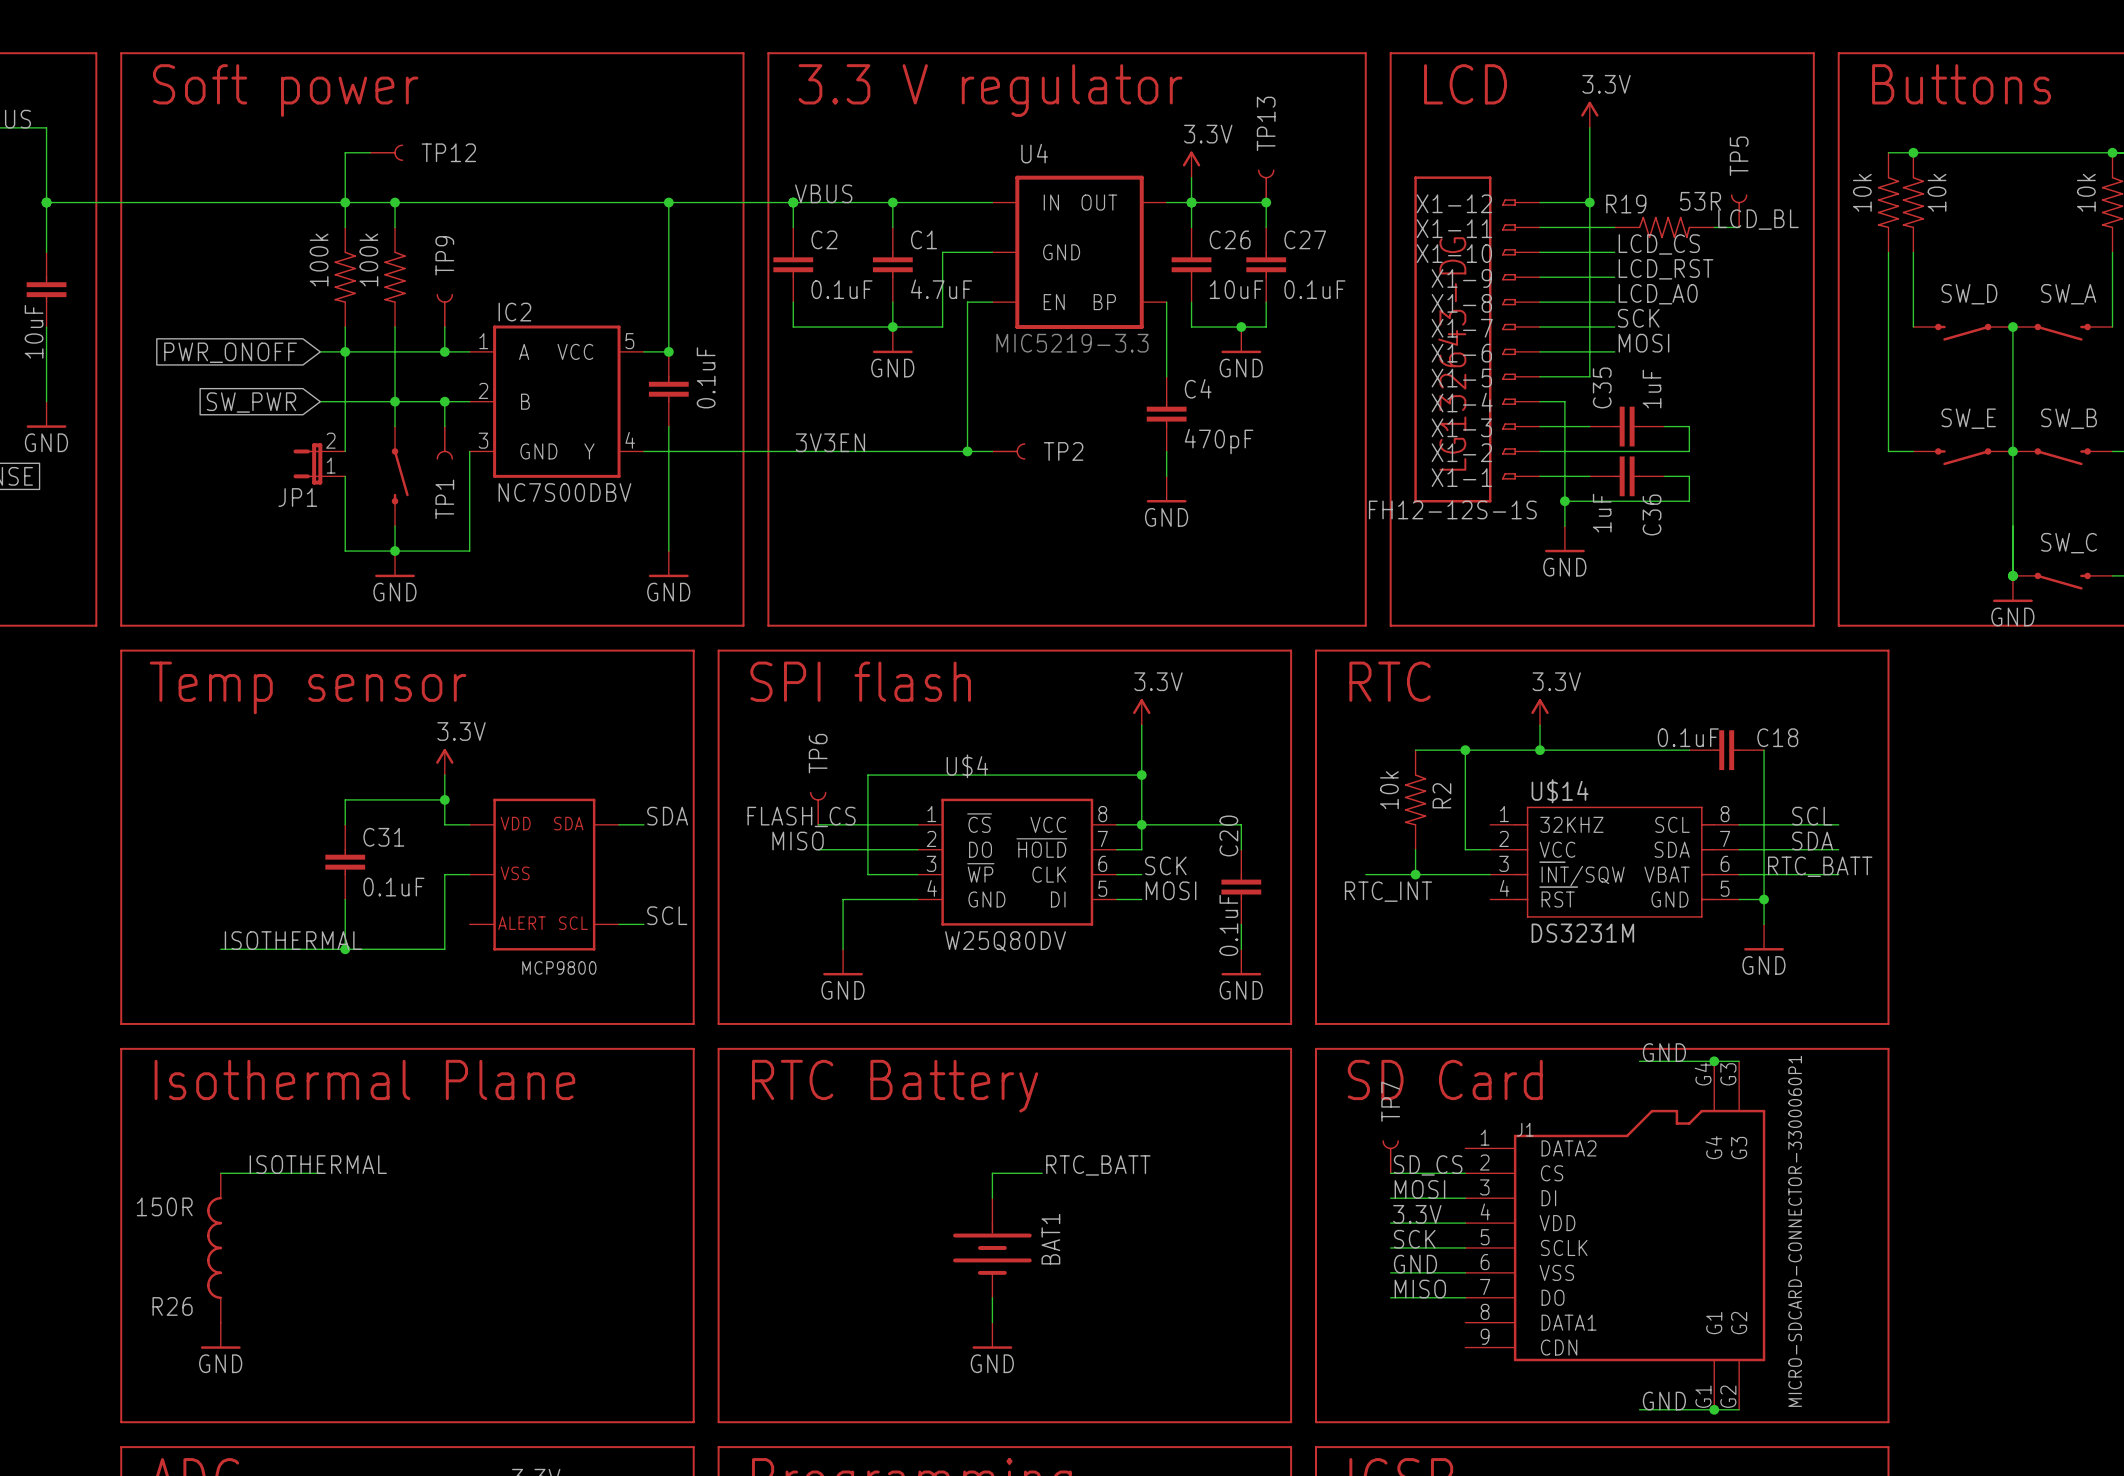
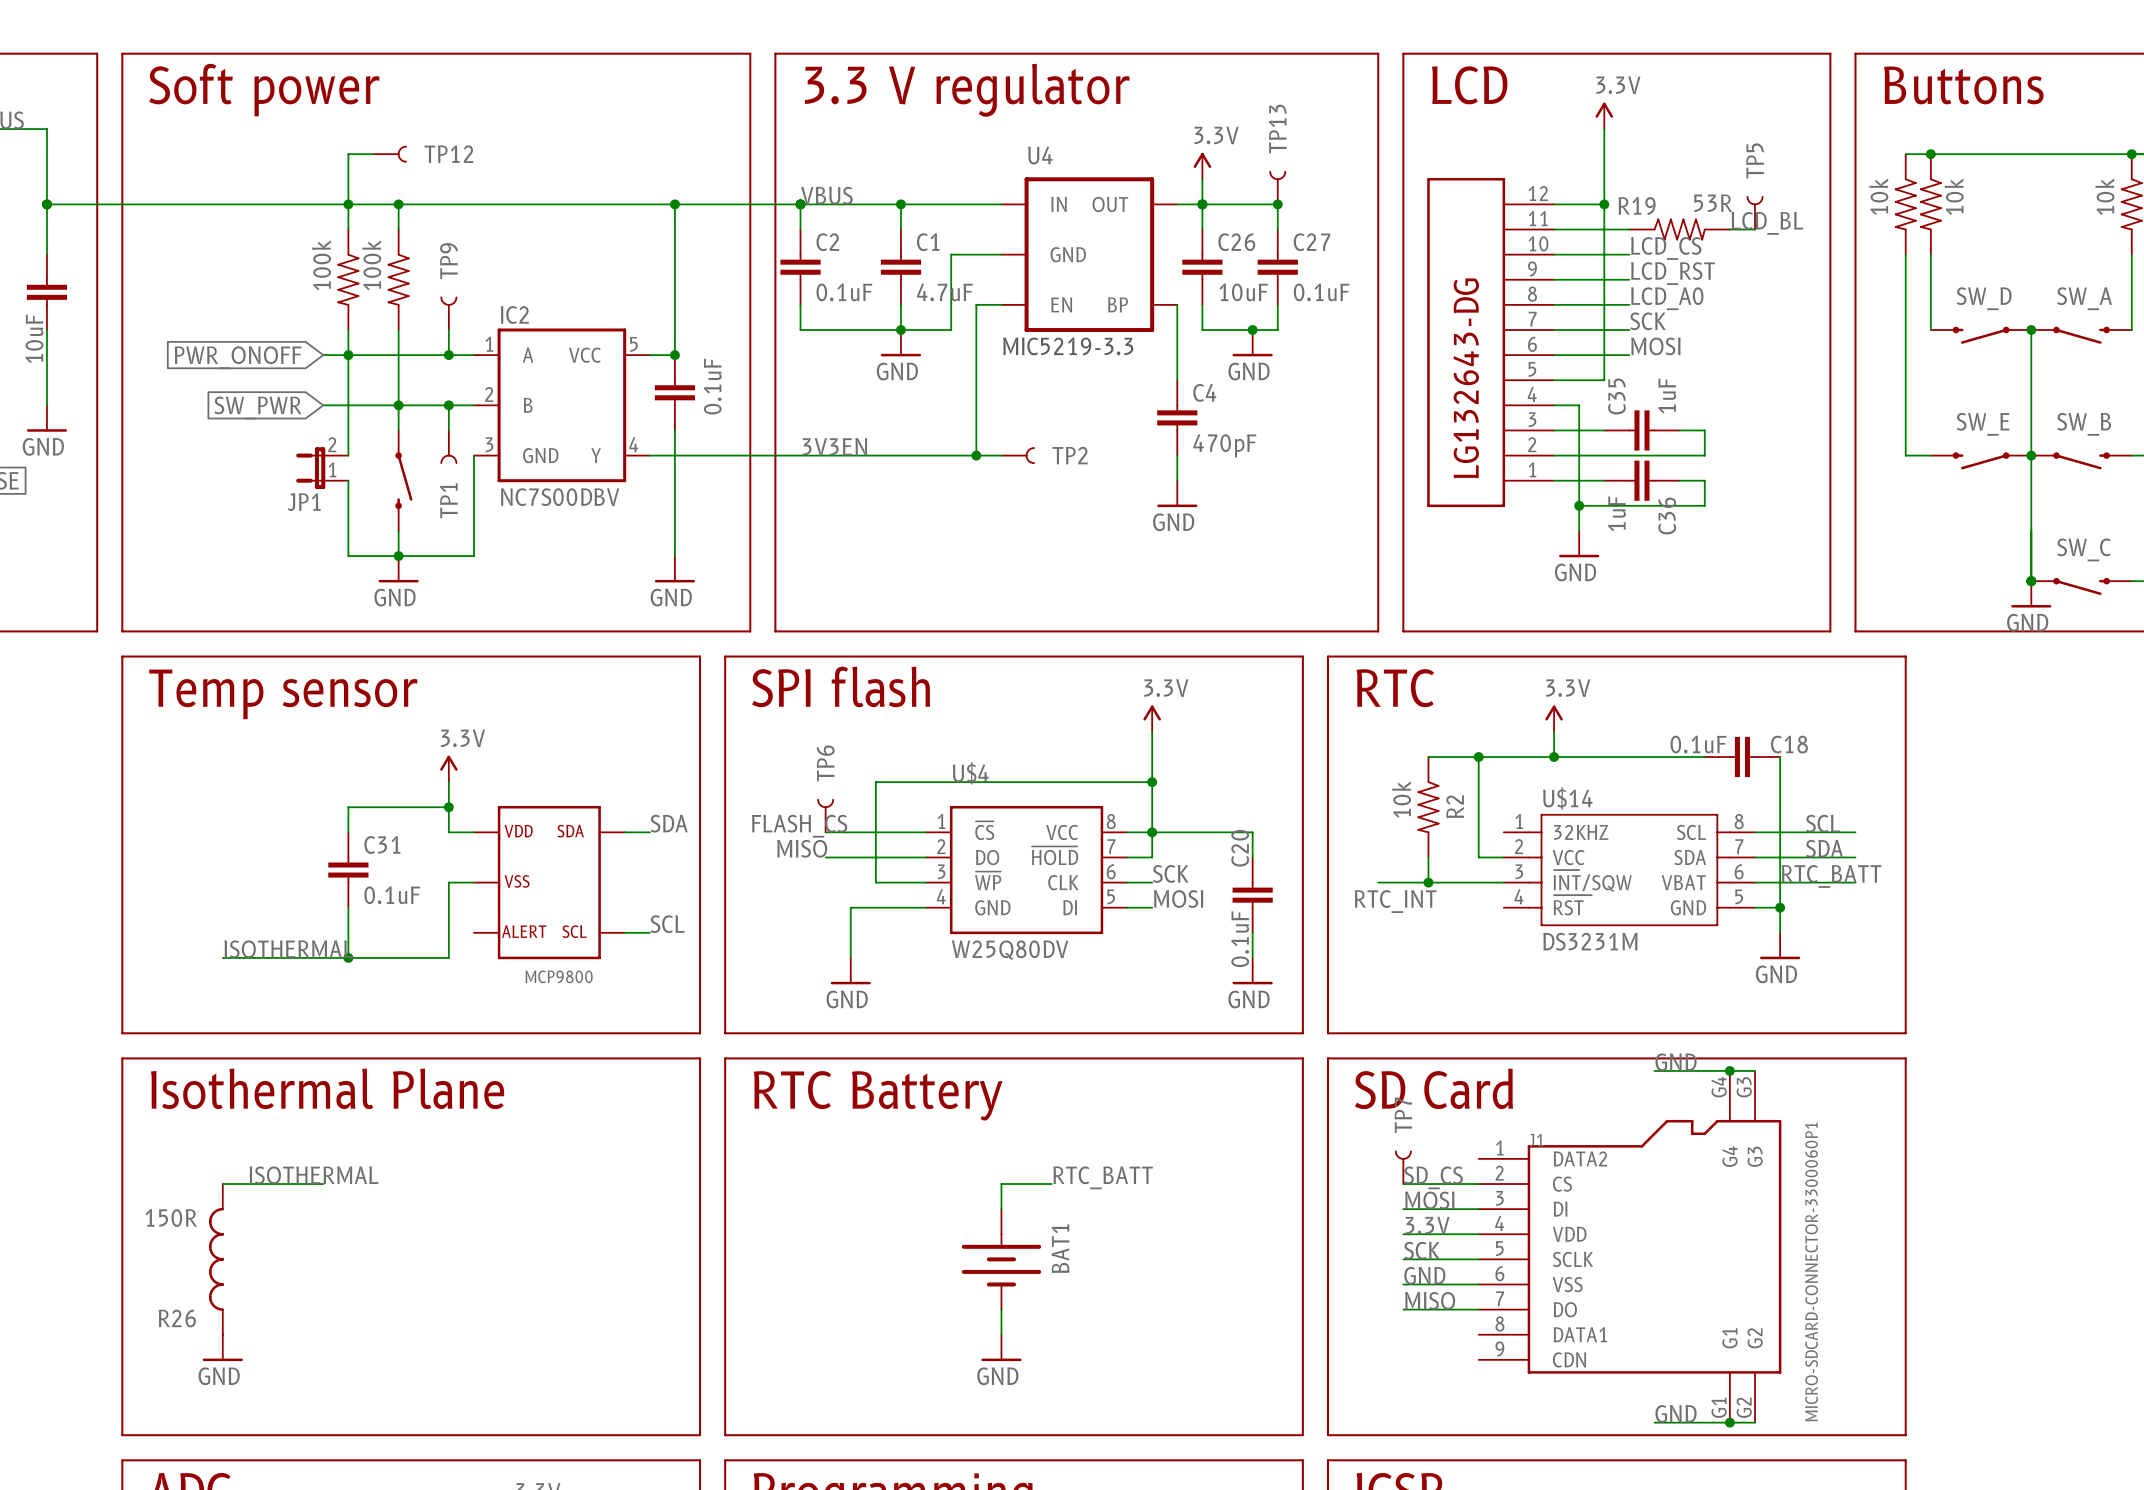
X1-12: (1520, 202) -> none
X1-11: (1520, 227) -> none
X1-10: (1520, 252) -> none
X1-9: (1520, 277) -> none
X1-8: (1520, 302) -> none
X1-7: (1520, 327) -> none
part: none -> (1528, 342)
X1-6: (1520, 351) -> none
X1-5: (1520, 376) -> none
X1-4: (1520, 401) -> none
X1-3: (1520, 426) -> none
X1-2: (1520, 451) -> none
X1-1: FH12-12S-1S (1520, 476) -> none

